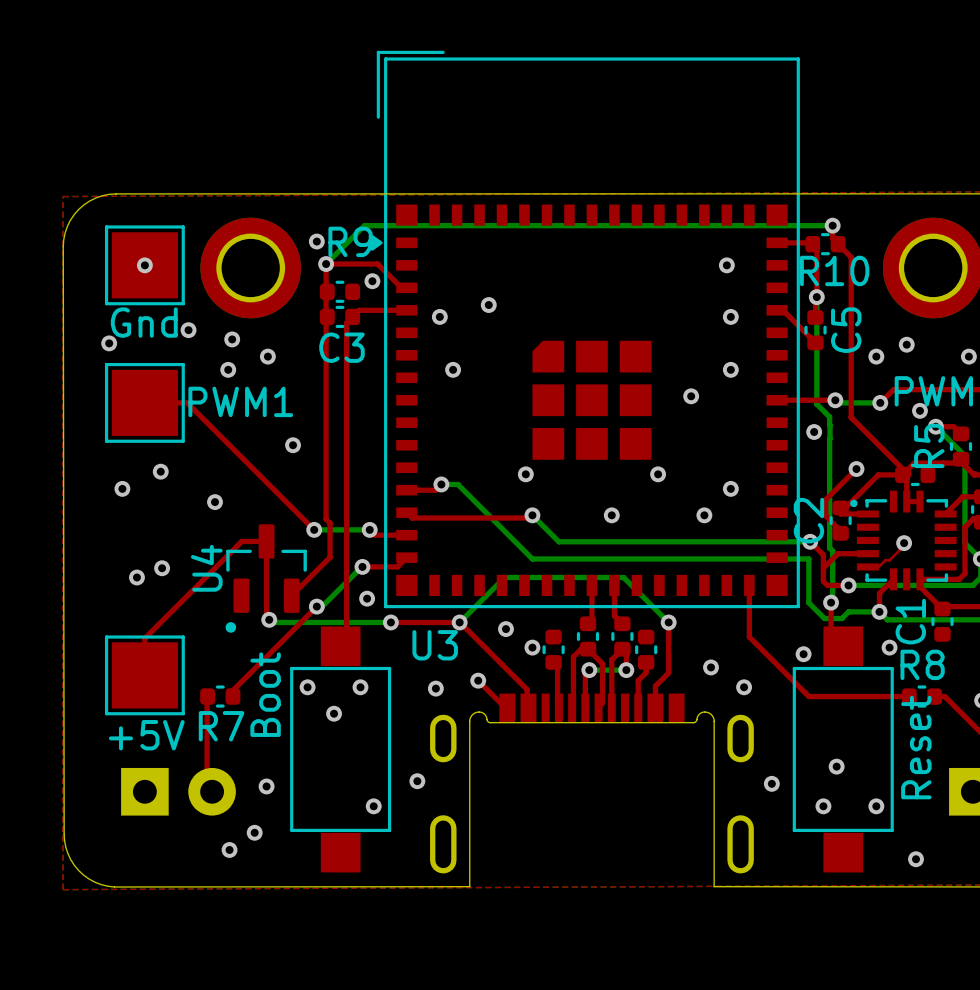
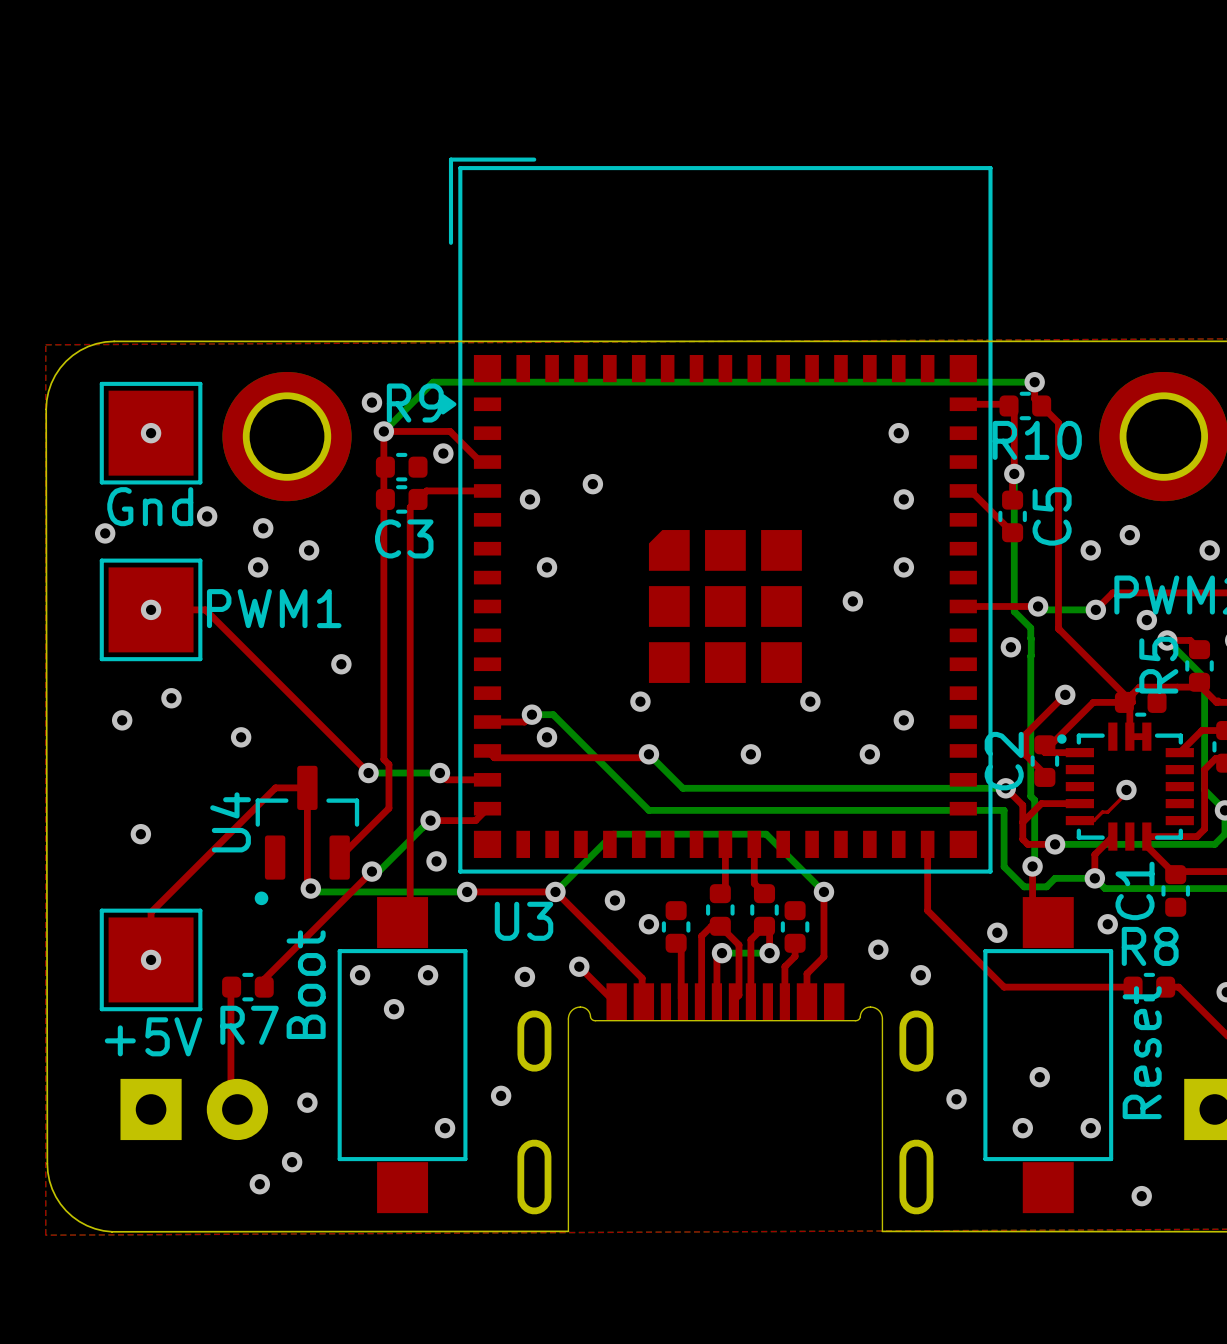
via: none -> (151, 609)
via: none -> (546, 737)
via: (162, 568) -> none
via: none -> (151, 959)

